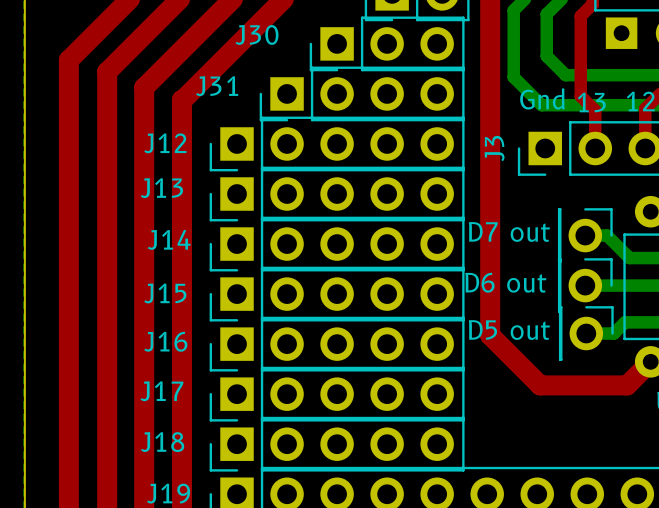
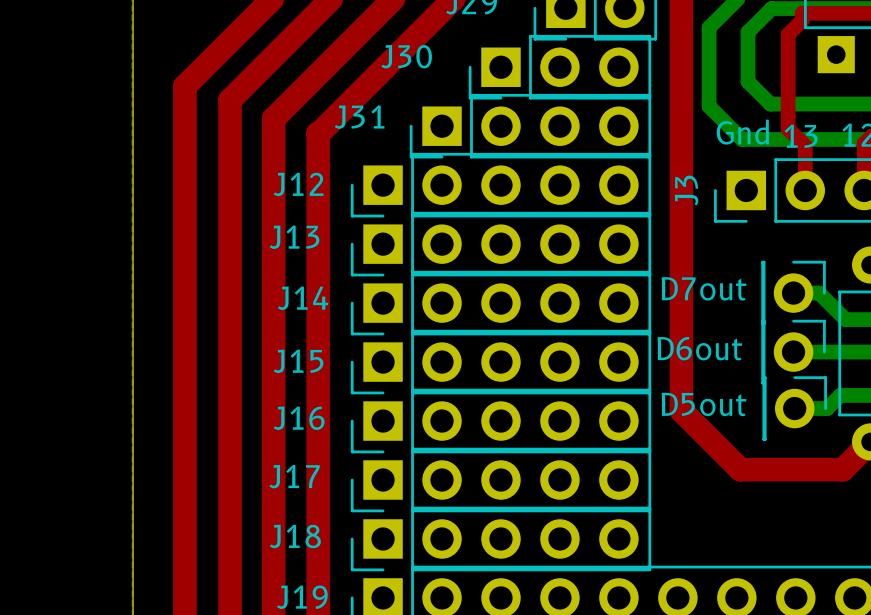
part value: D7 out (509, 231) -> D7out (703, 288)
part value: D6 out (505, 282) -> D6out (699, 348)
part value: D5 out (509, 330) -> D5out (703, 404)

